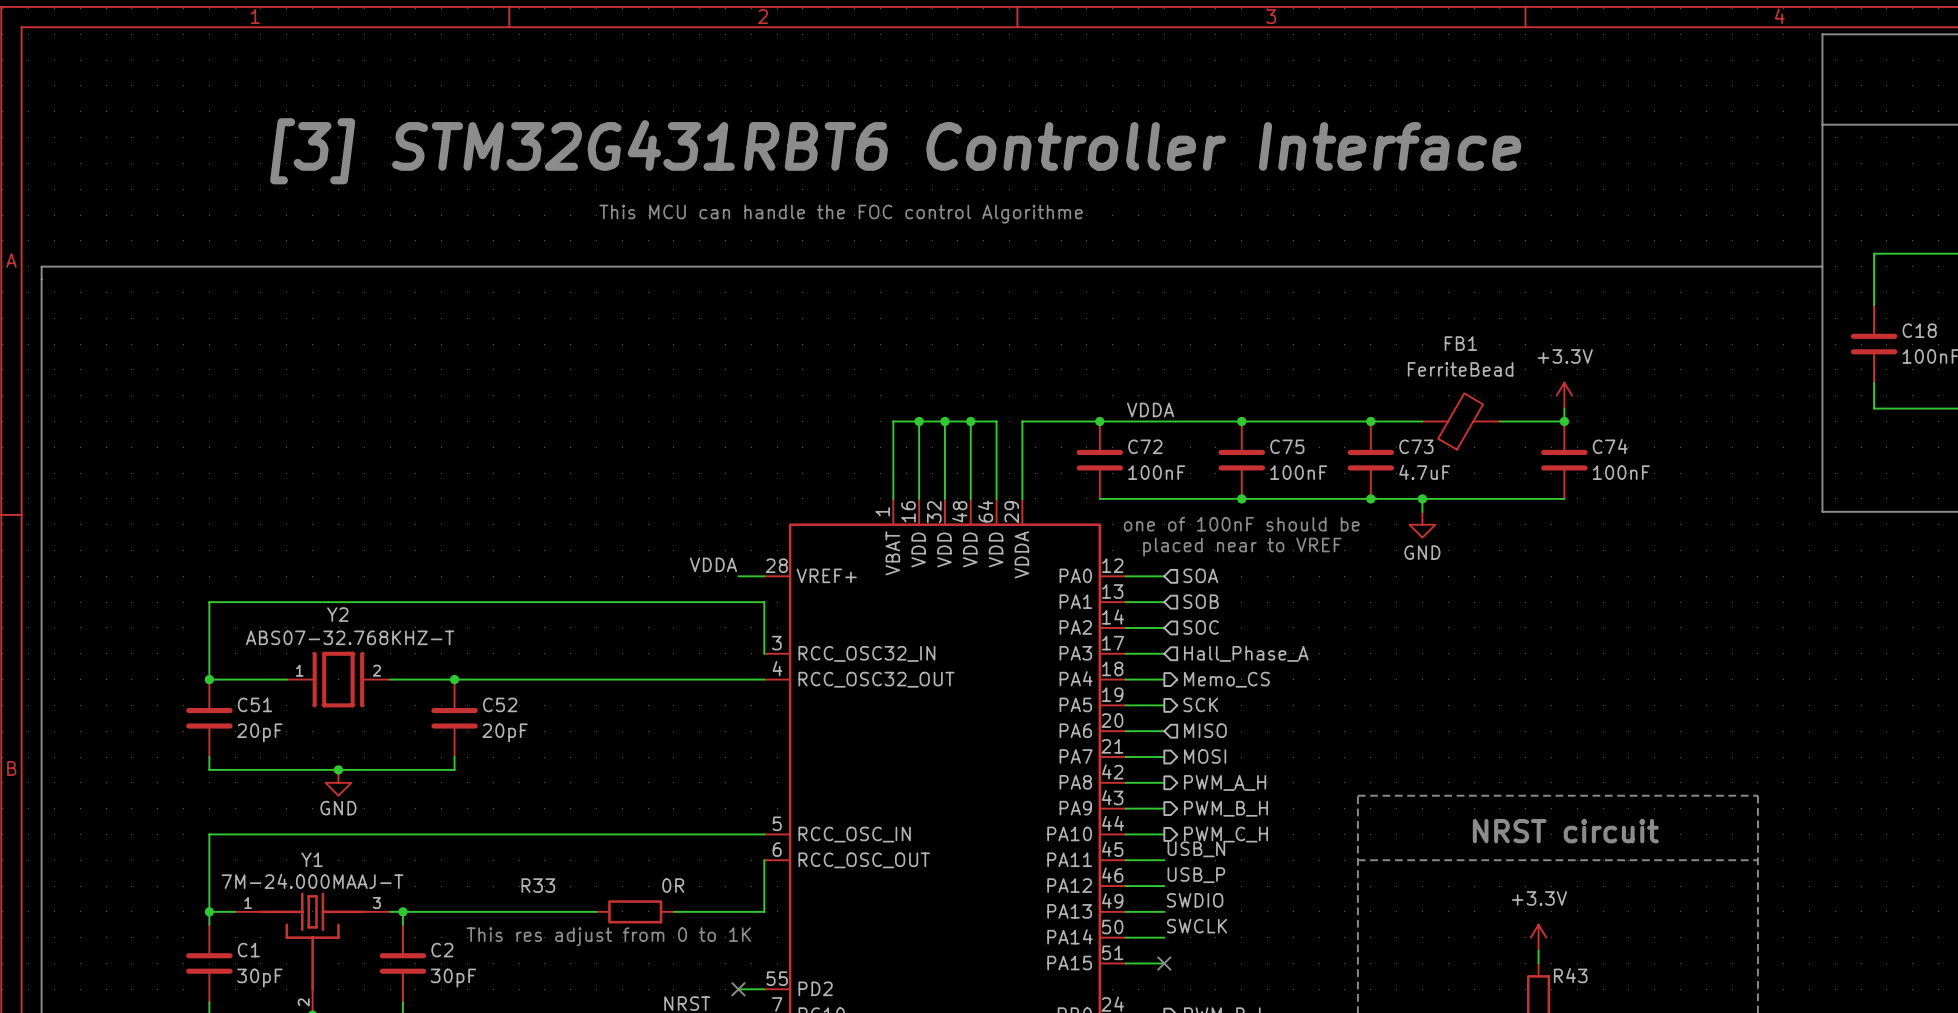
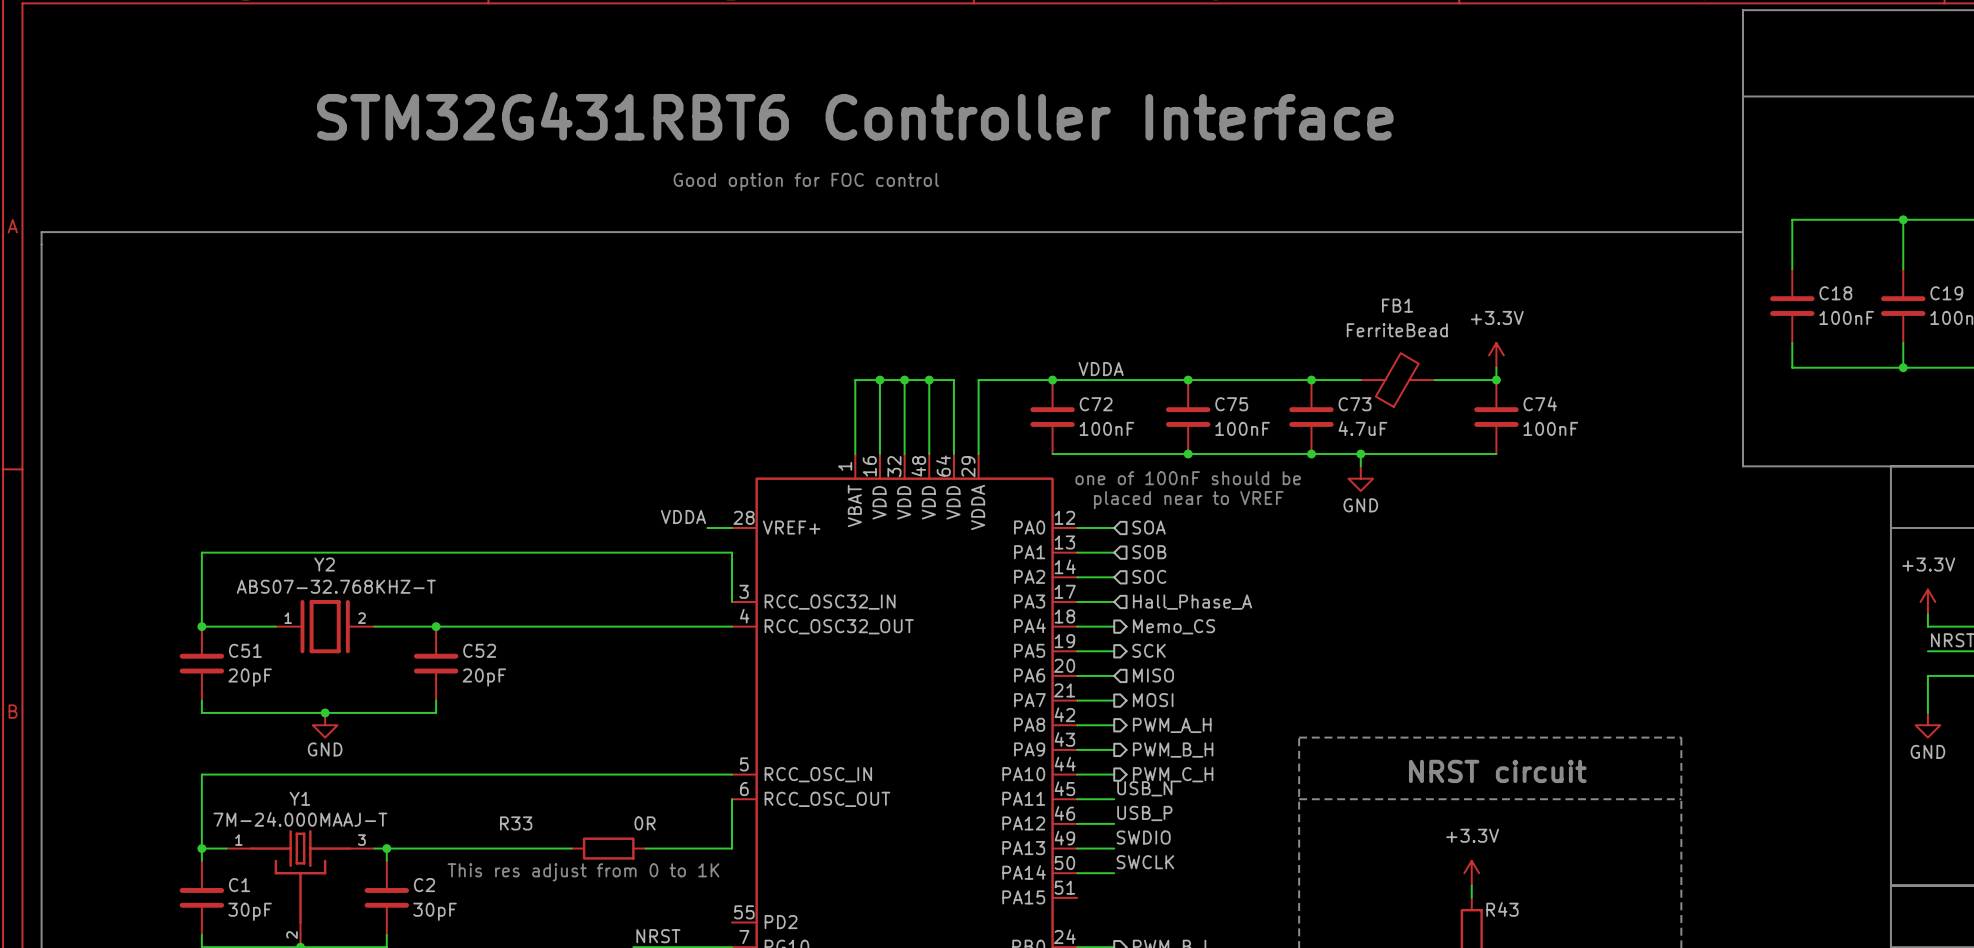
text: [3] STM32G431RBT6 Controller Interface (895, 151) -> STM32G431RBT6 Controller Interface (855, 116)
text: This MCU can handle the FOC control Algorithme (841, 214) -> Good option for FOC control (806, 181)
wire: (1125, 963) (1164, 963) -> none
no-connect mark: (1164, 963) -> none
wire: (738, 989) (764, 989) -> none
no-connect mark: (738, 989) -> none

